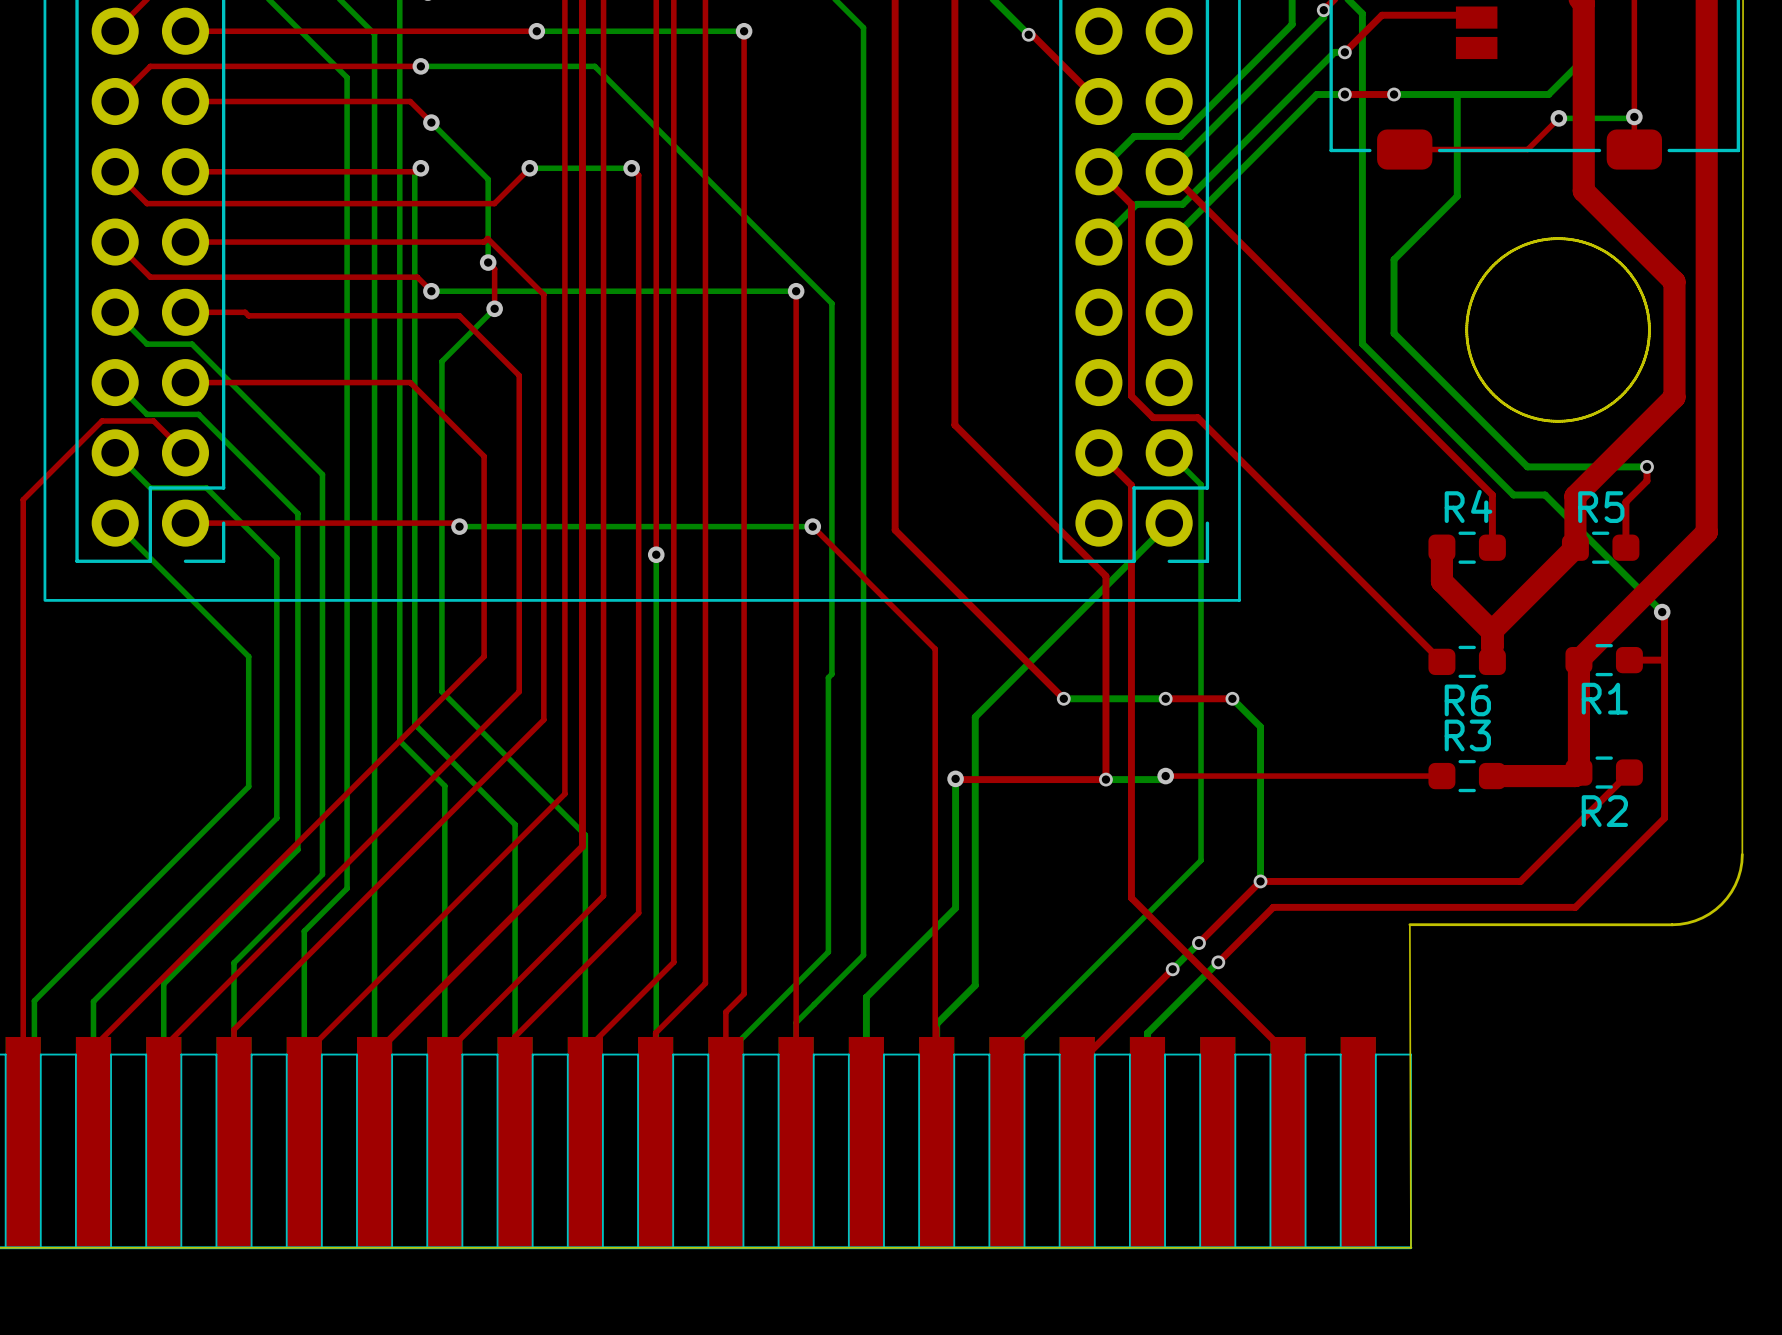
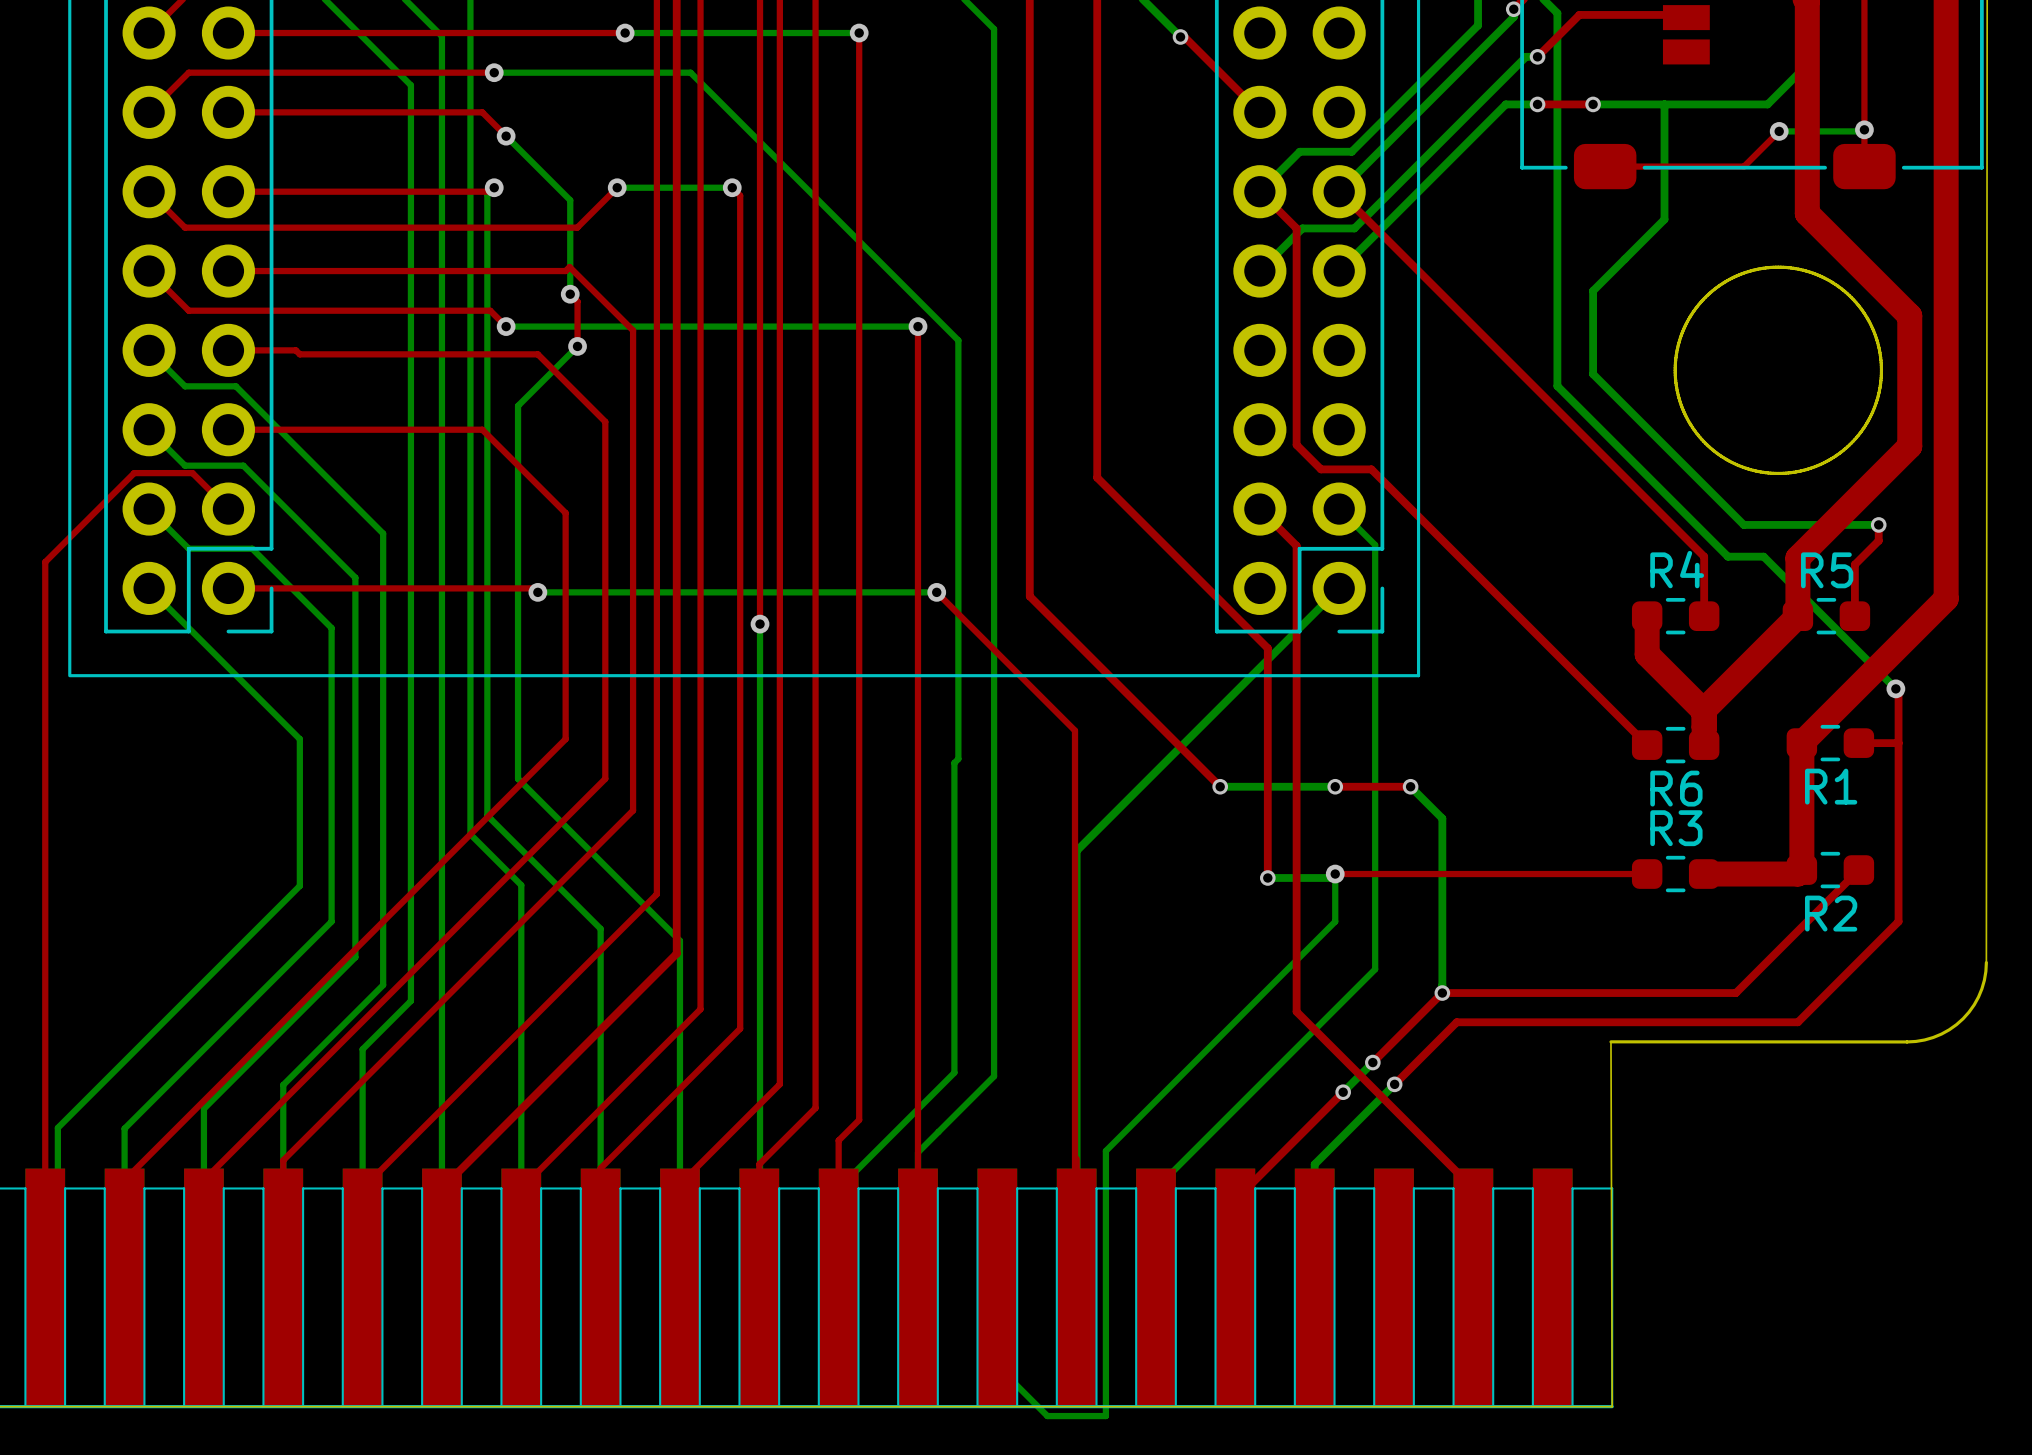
bottom track: (975, 717) (975, 985) (936, 1024) -> (1120, 807) (1076, 850) (1076, 1154)
bottom track: none -> (1335, 874) (1335, 921) (1105, 1150) (1105, 1416) (1047, 1416) (997, 1365)
bottom track: (955, 778) (955, 908) (866, 997) (866, 1142) -> none
top track: (955, 778) (1105, 779) -> none
via: (955, 778) -> none

